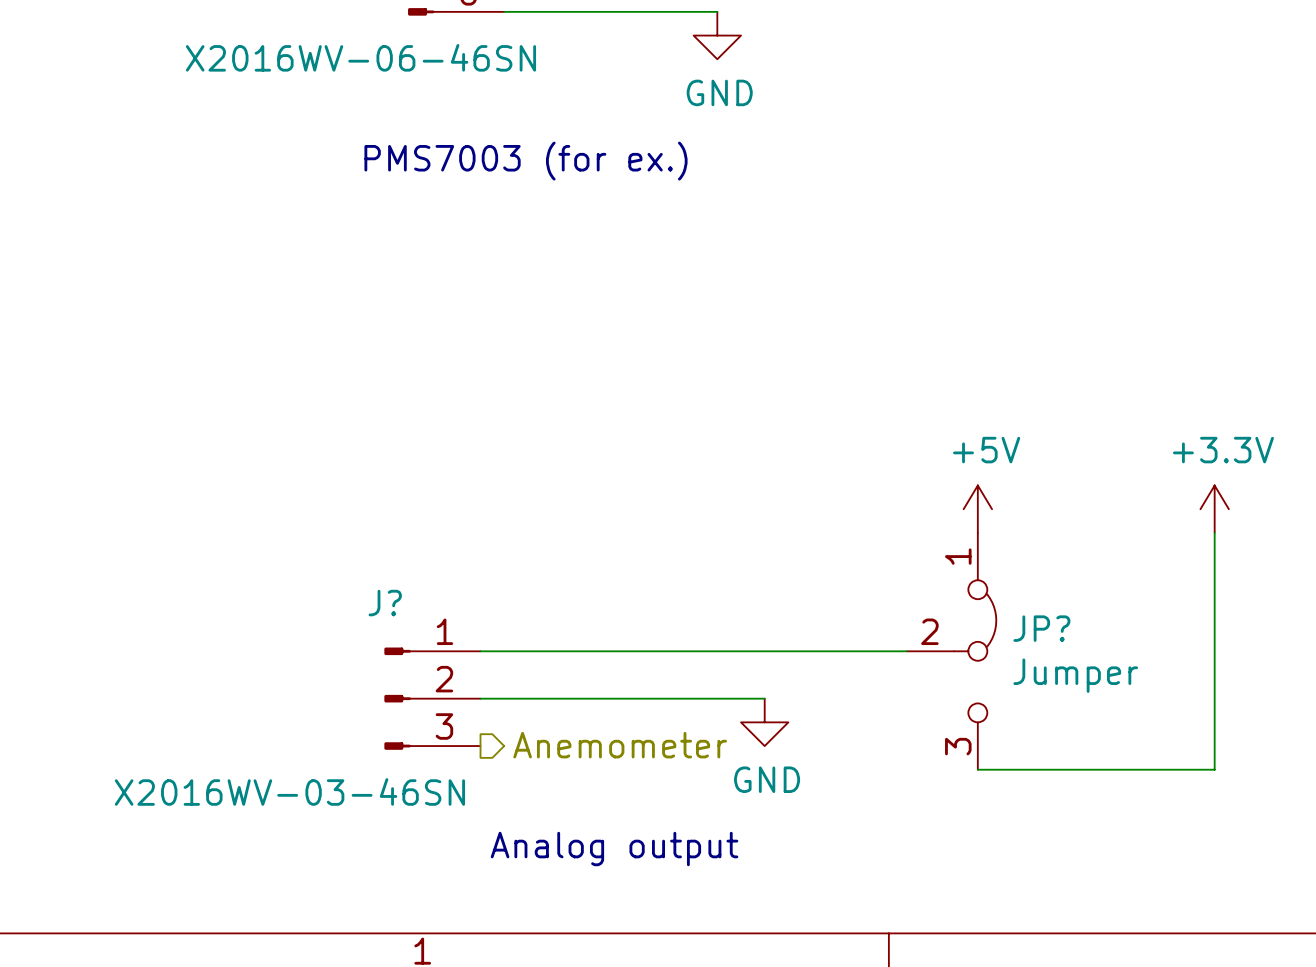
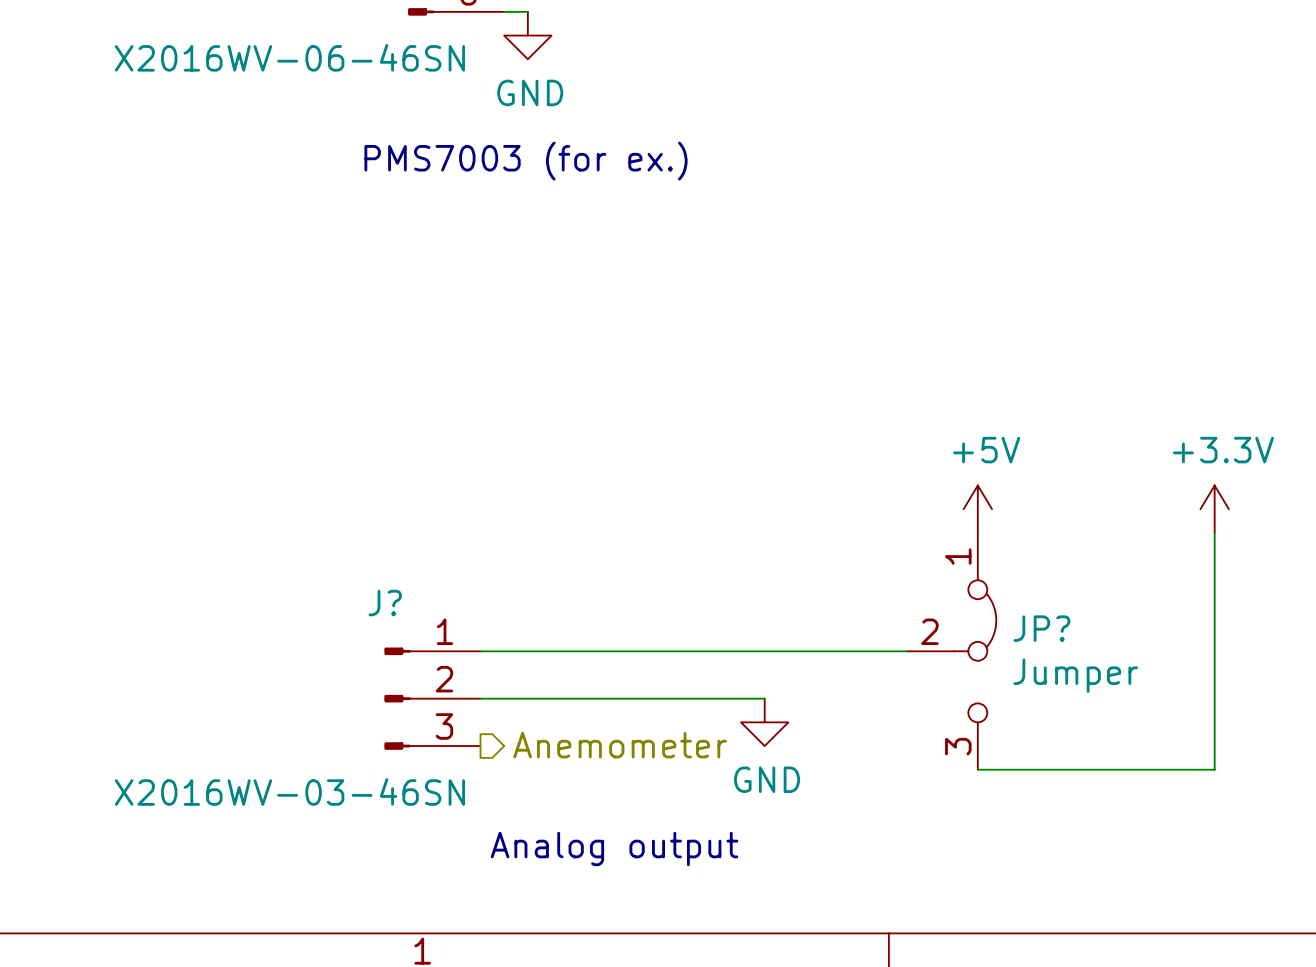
wire: (527, 11) (717, 11) -> none
power symbol position: GND (717, 35) -> GND (527, 35)
part value position: X2016WV-06-46SN (360, 57) -> X2016WV-06-46SN (289, 57)

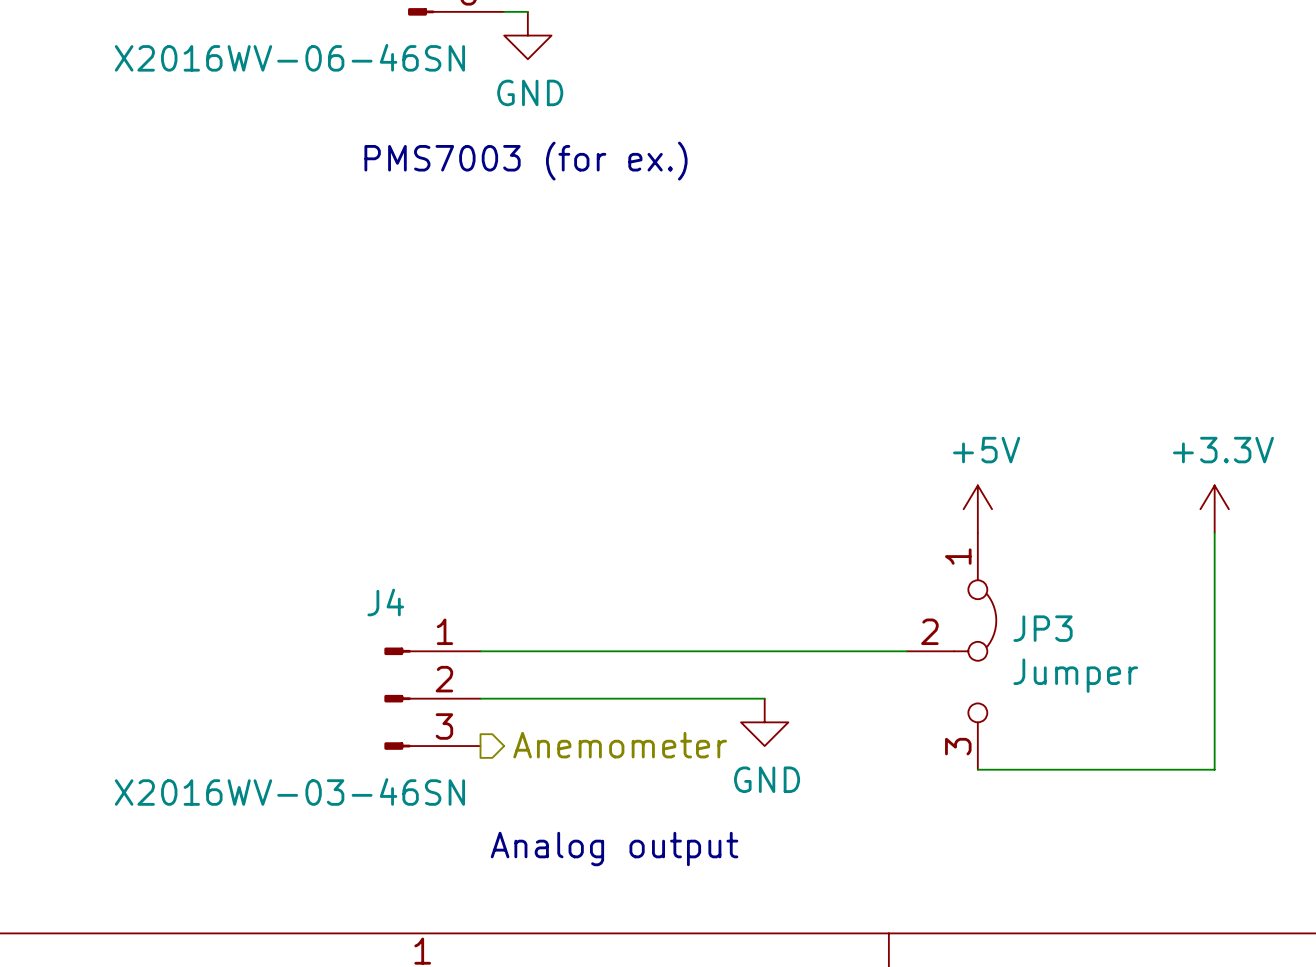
J? name: J? (385, 603) -> J4 (385, 602)
JP? name: JP? (1041, 628) -> JP3 (1043, 628)

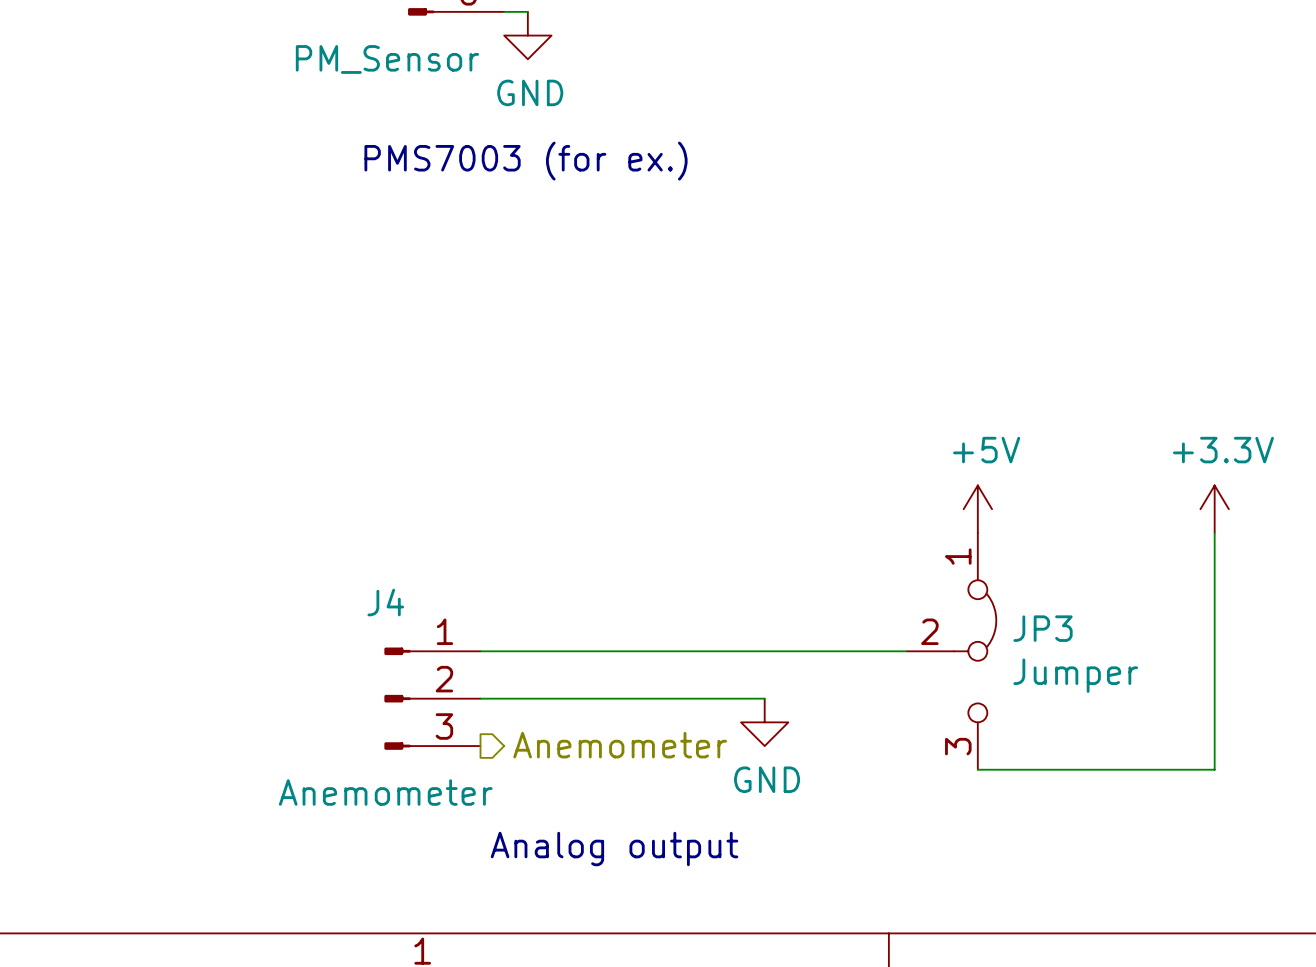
part value: X2016WV-06-46SN (289, 57) -> PM_Sensor (387, 59)
J4 value: X2016WV-03-46SN (289, 791) -> Anemometer (385, 792)

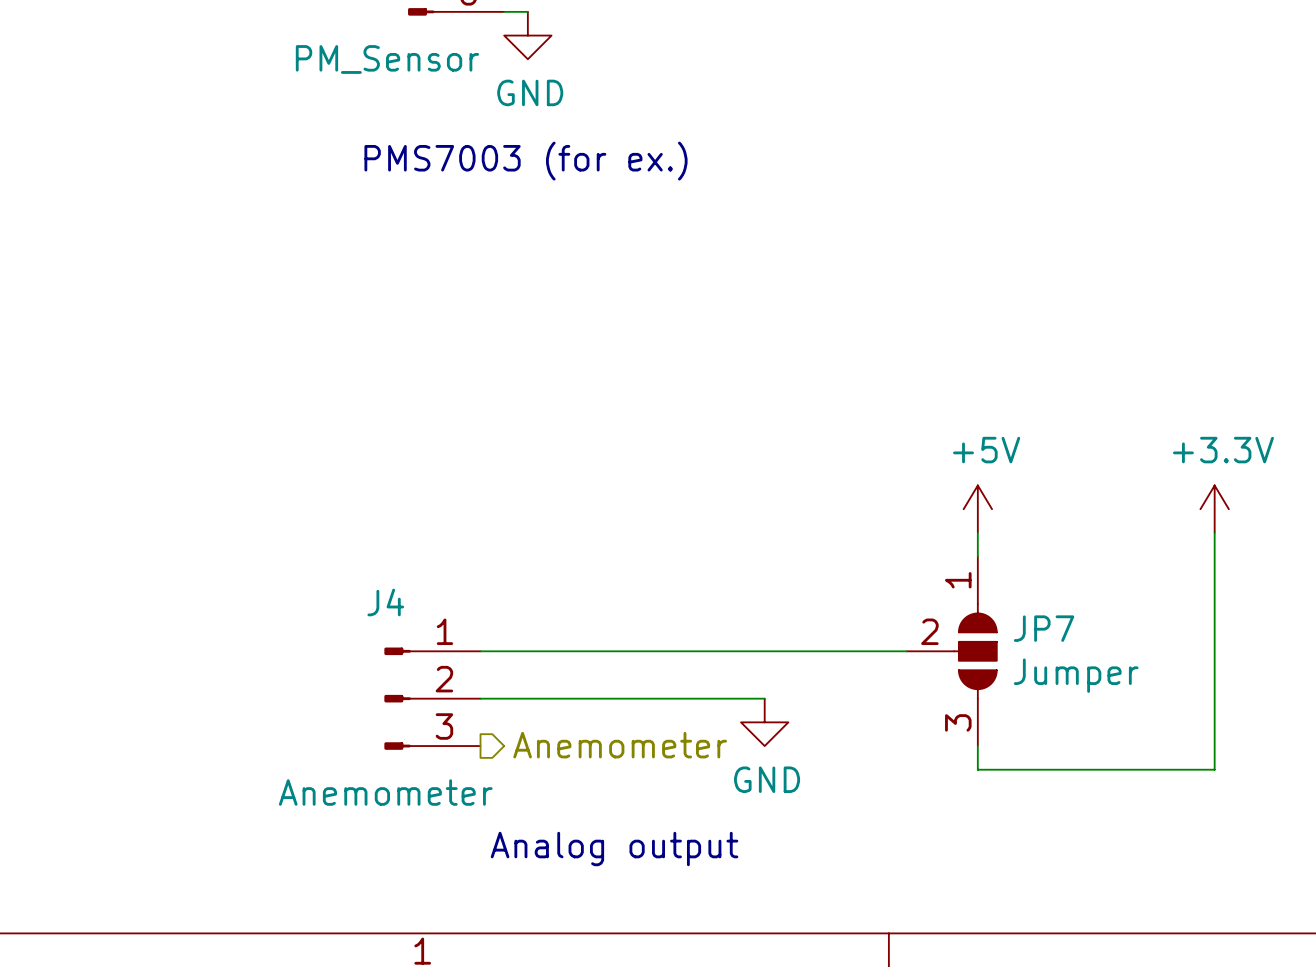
JP3: Jumper (951, 651) -> none
JP7: none -> Jumper (951, 651)

